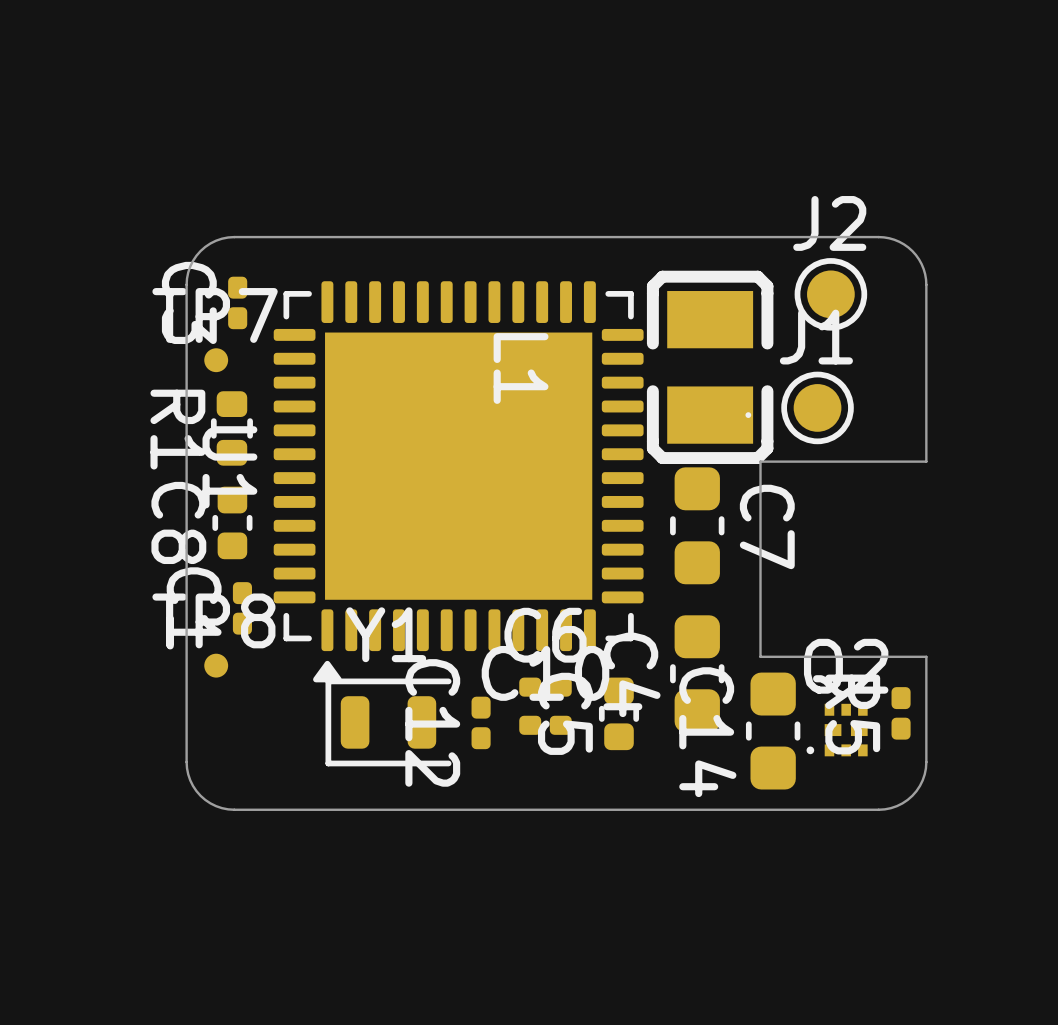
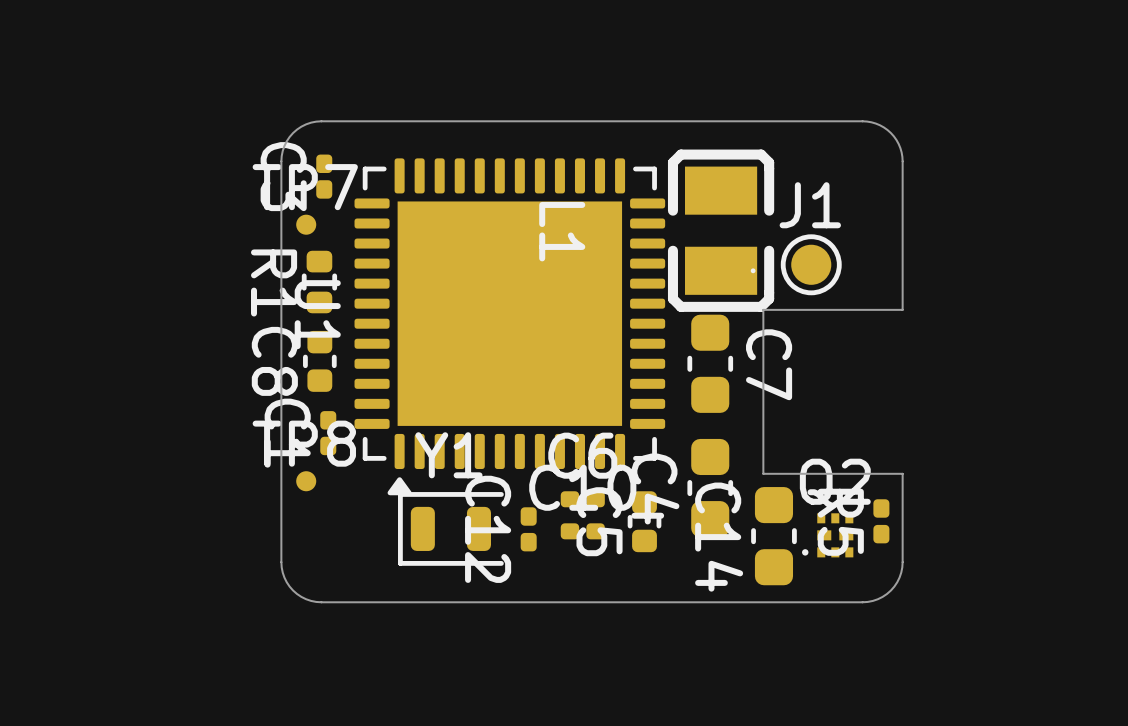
J2: (830, 294) -> none

